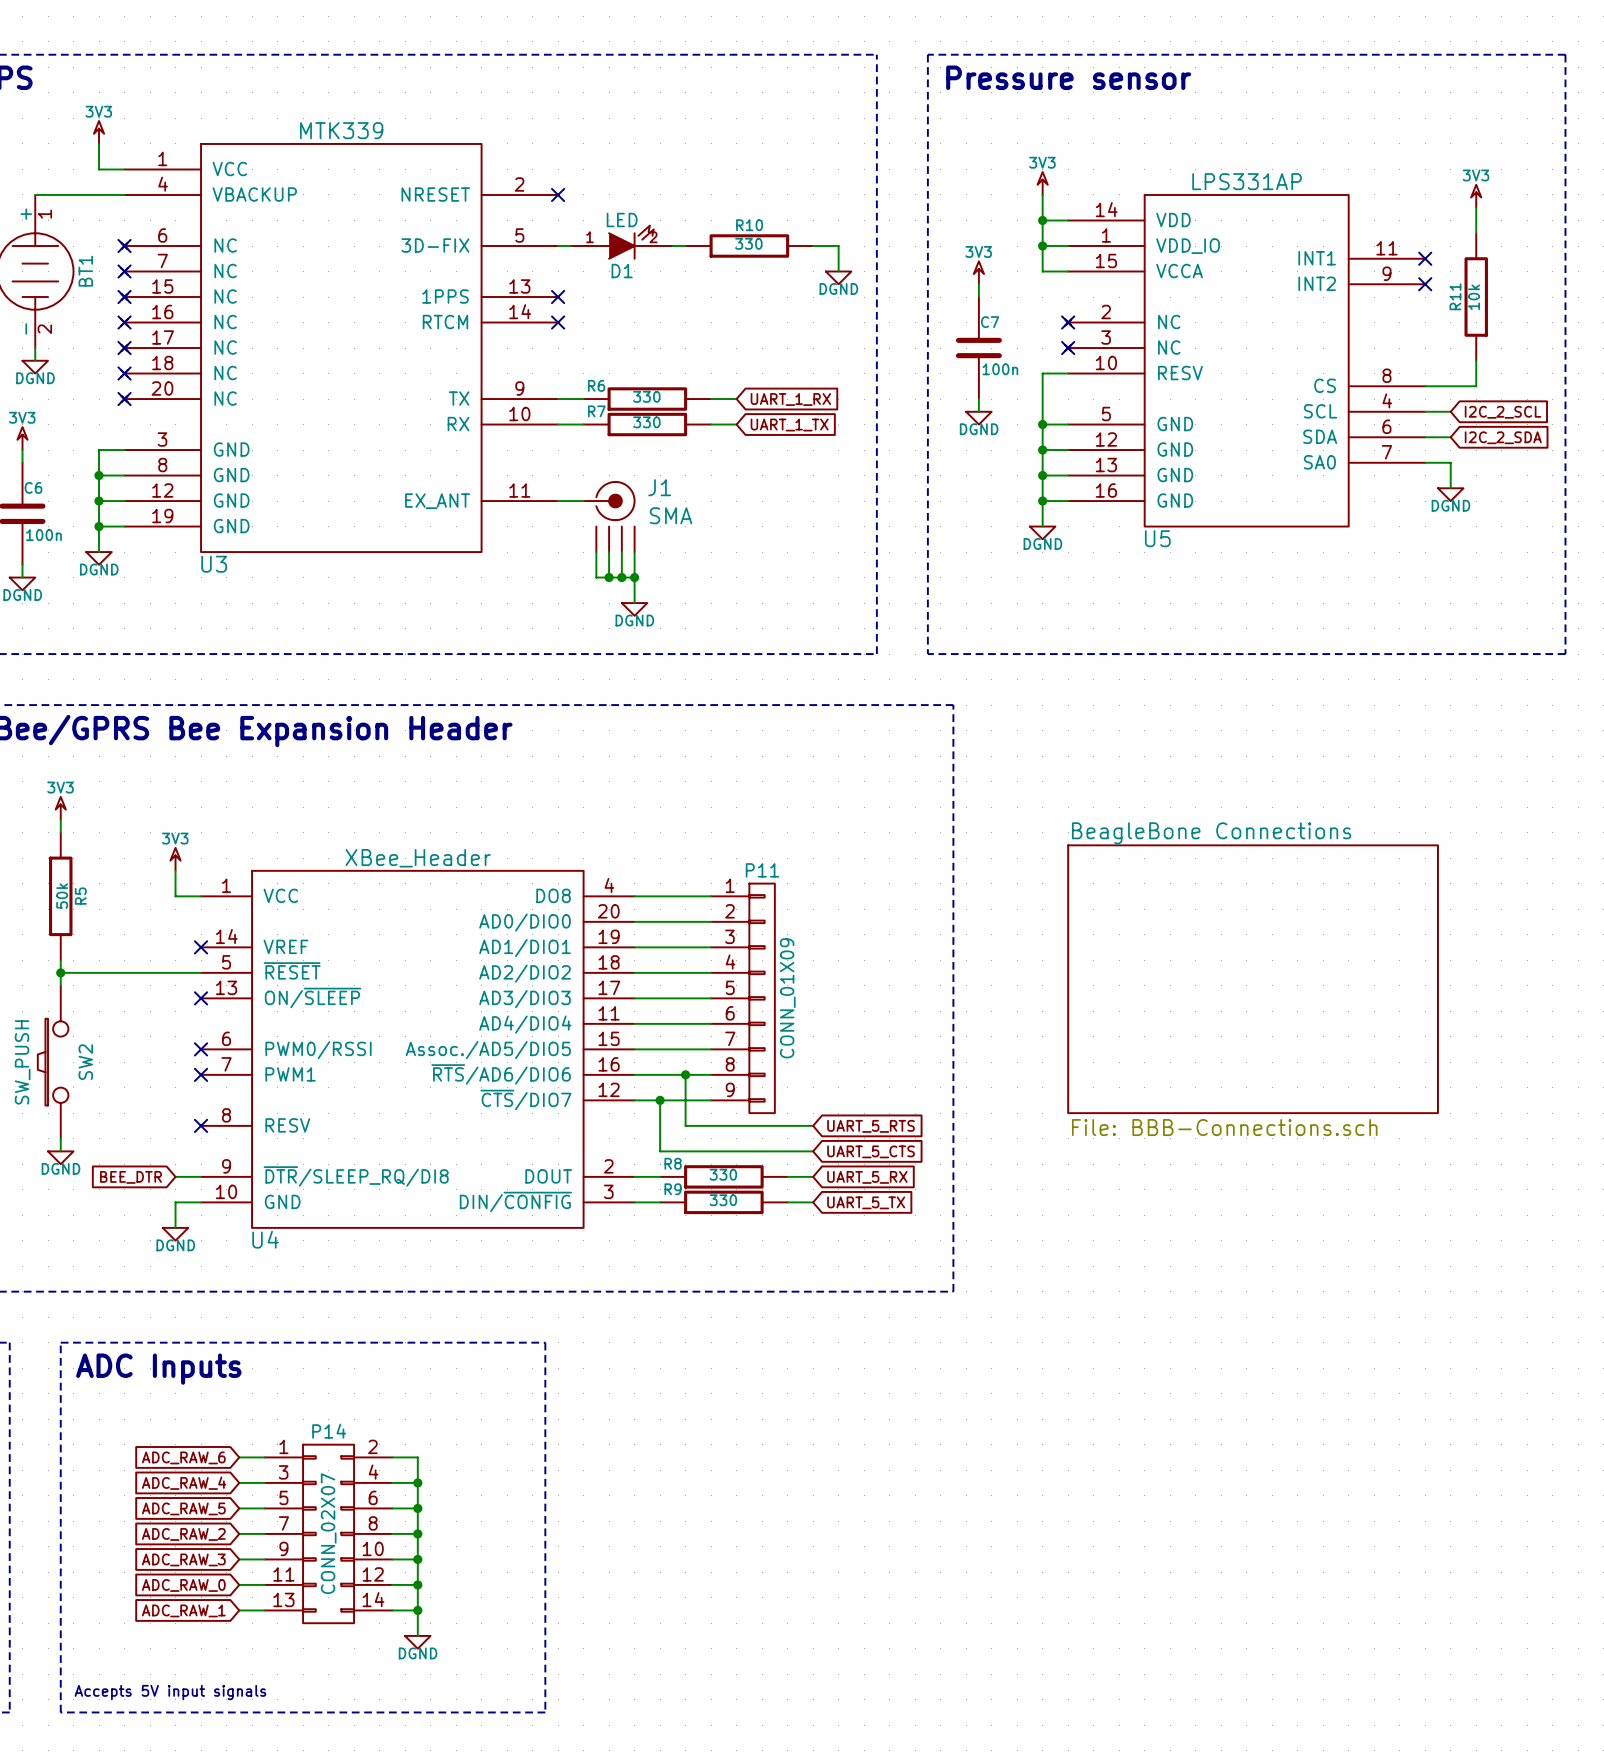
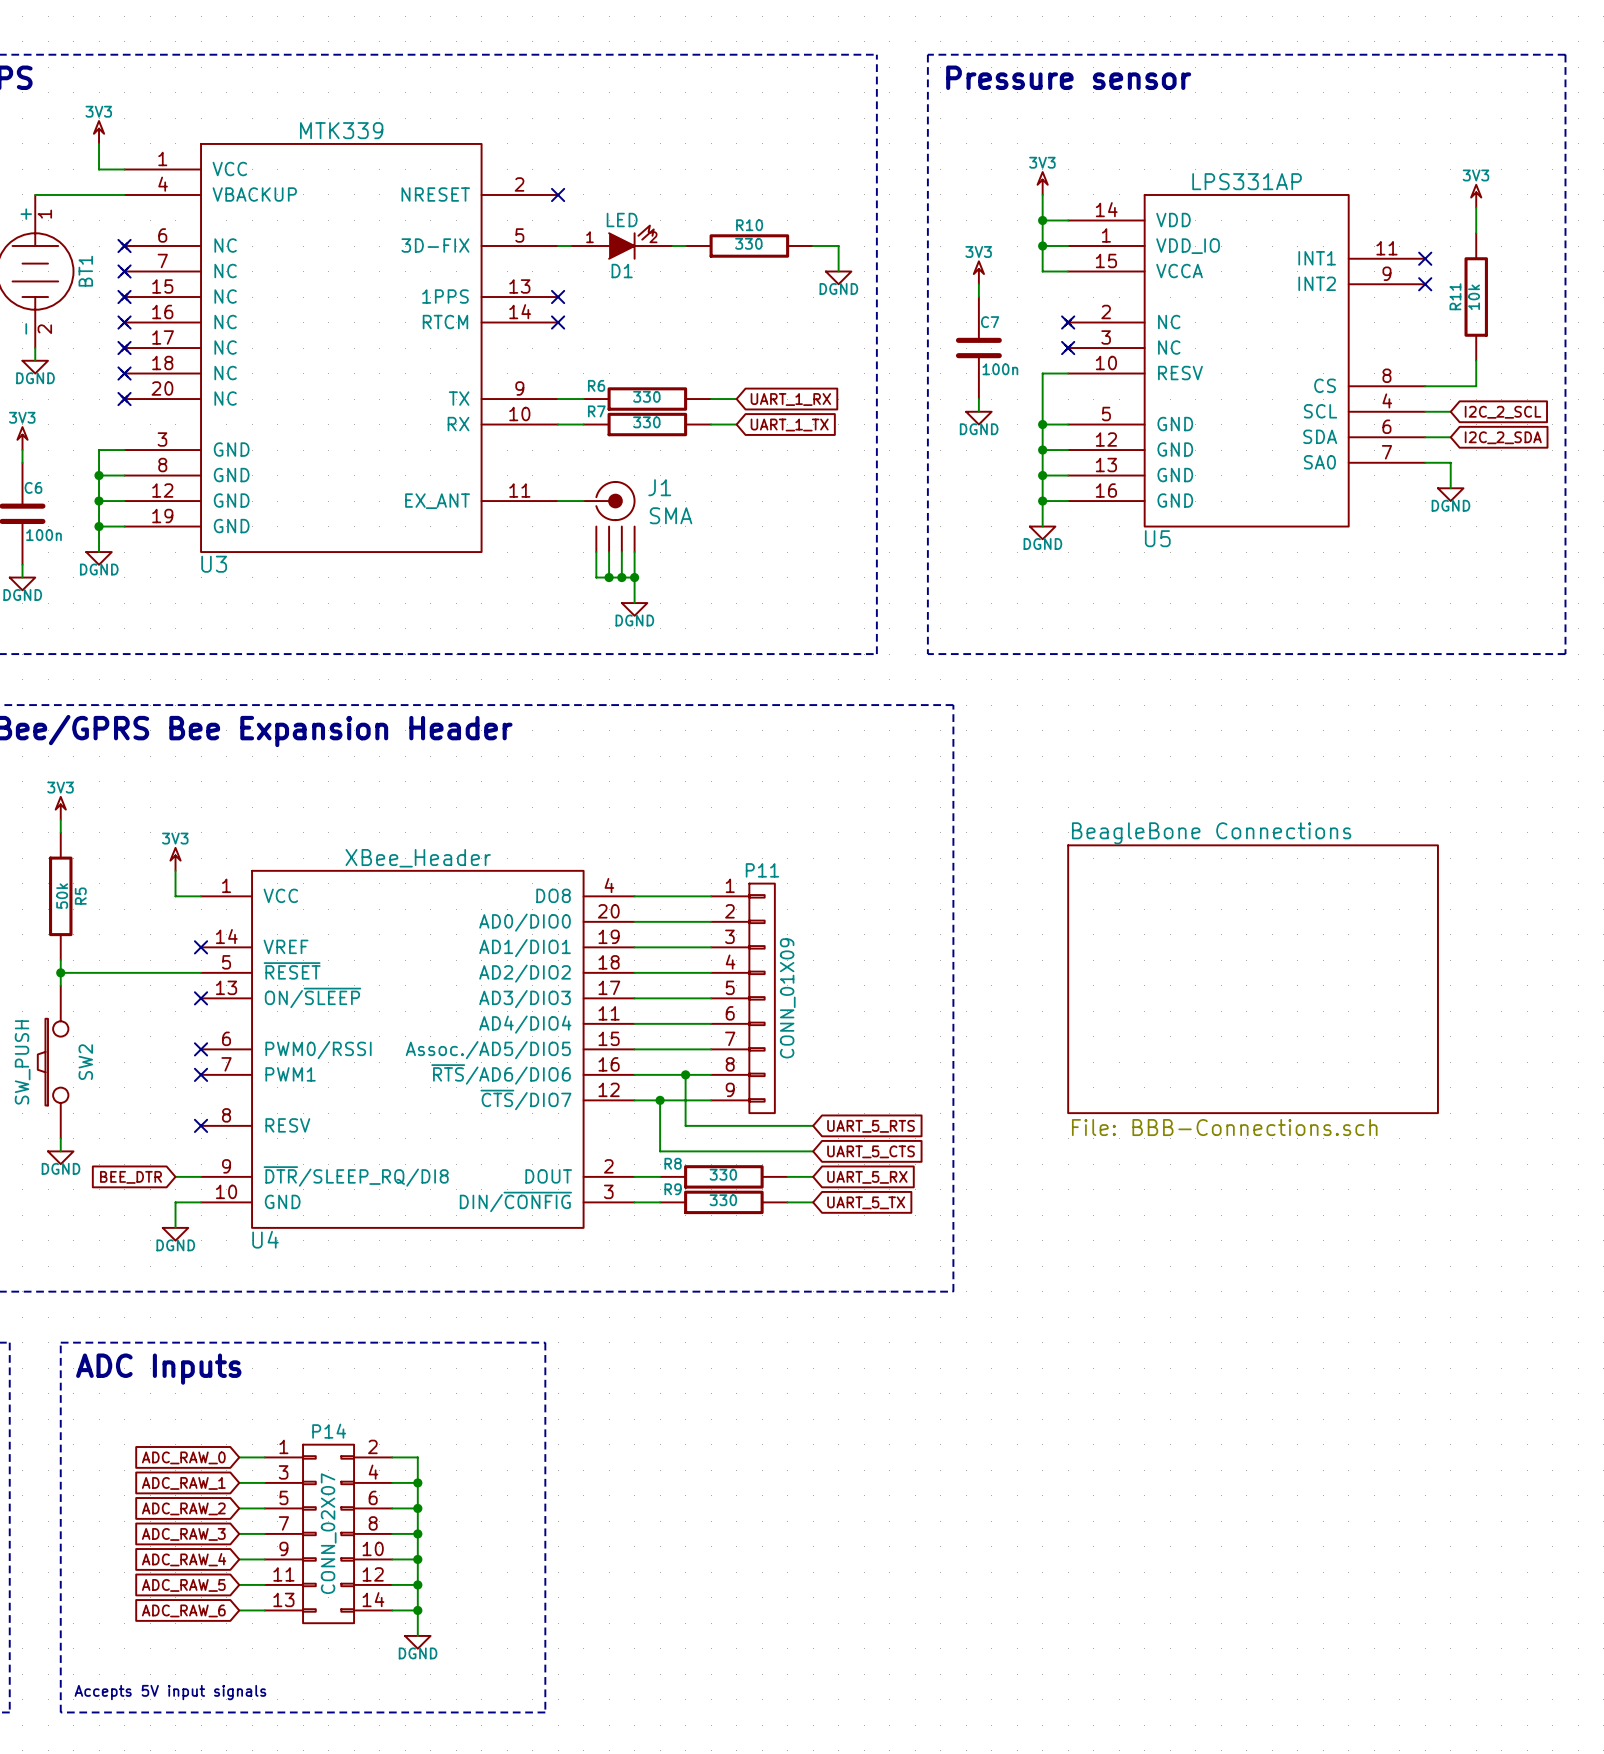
global label: ADC_RAW_6 (183, 1457) -> ADC_RAW_0 (183, 1457)
global label: ADC_RAW_4 (184, 1483) -> ADC_RAW_1 (183, 1483)
global label: ADC_RAW_5 (183, 1508) -> ADC_RAW_2 (183, 1508)
global label: ADC_RAW_2 (183, 1534) -> ADC_RAW_3 (183, 1534)
global label: ADC_RAW_3 (183, 1559) -> ADC_RAW_4 (184, 1559)
global label: ADC_RAW_0 (183, 1585) -> ADC_RAW_5 (183, 1585)
global label: ADC_RAW_1 (183, 1610) -> ADC_RAW_6 (183, 1610)

